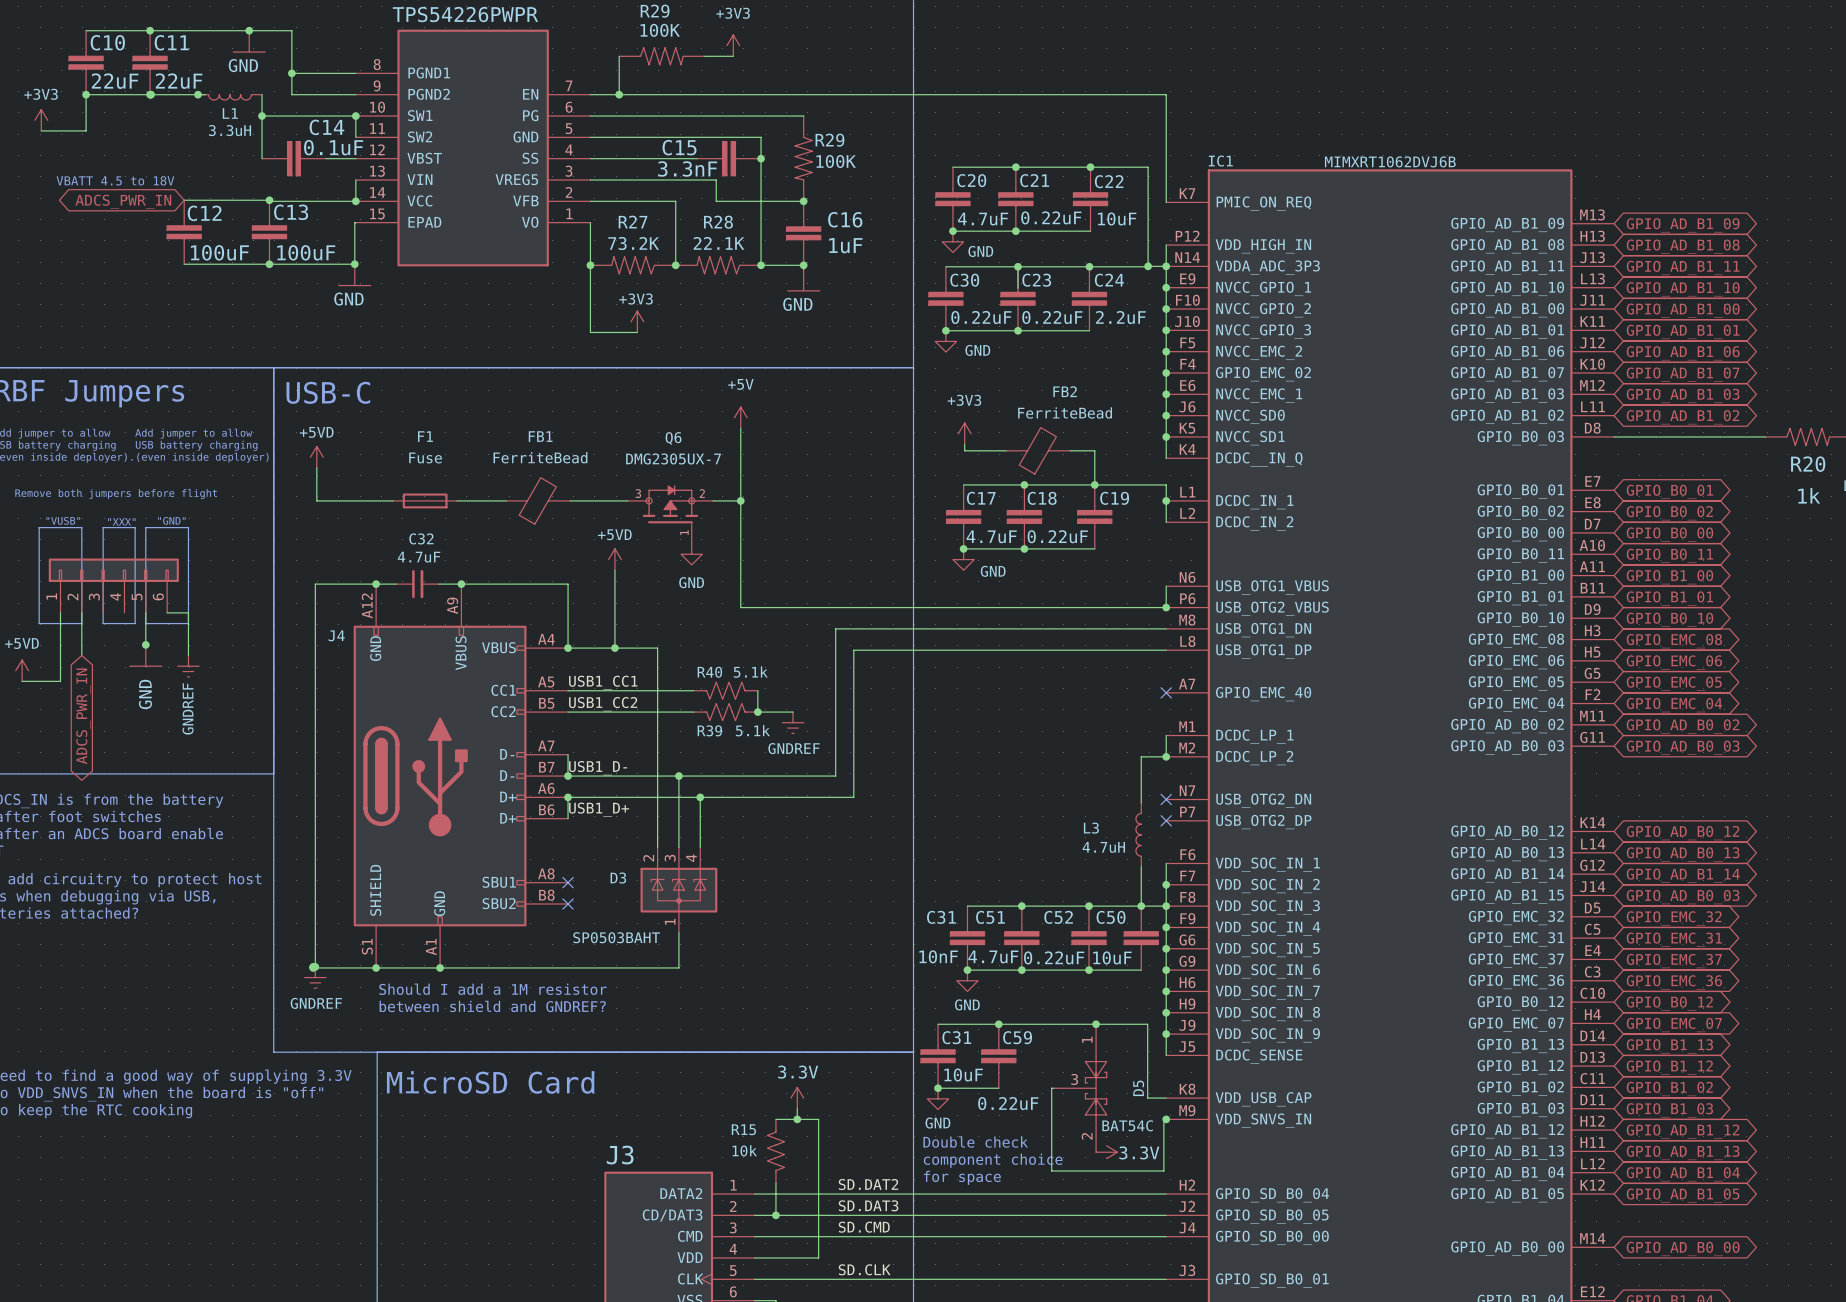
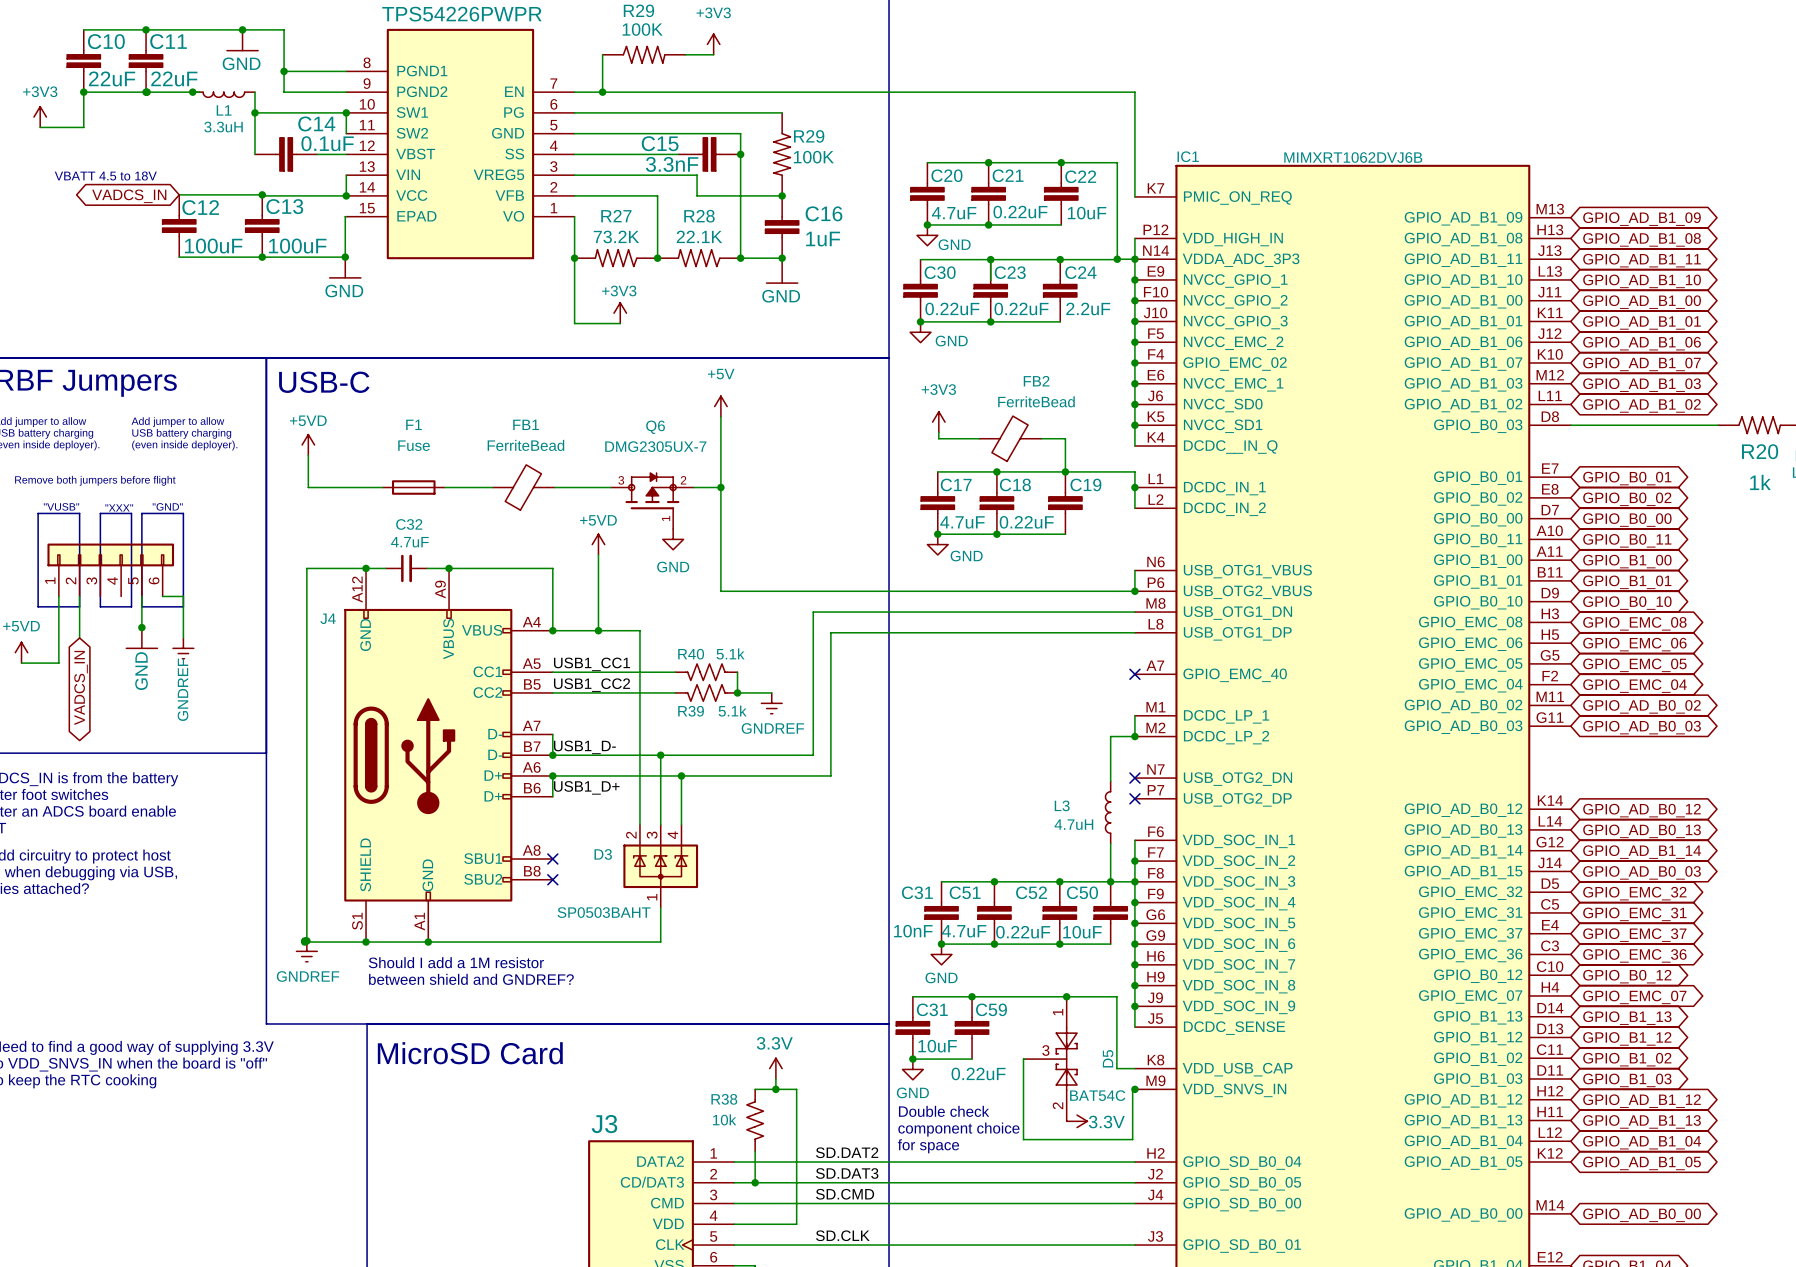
global label: ADCS_PWR_IN (123, 201) -> VADCS_IN (129, 196)
global label: ADCS_PWR_IN (83, 716) -> VADCS_IN (81, 687)
R15 name: R15 (743, 1129) -> R38 (724, 1099)

